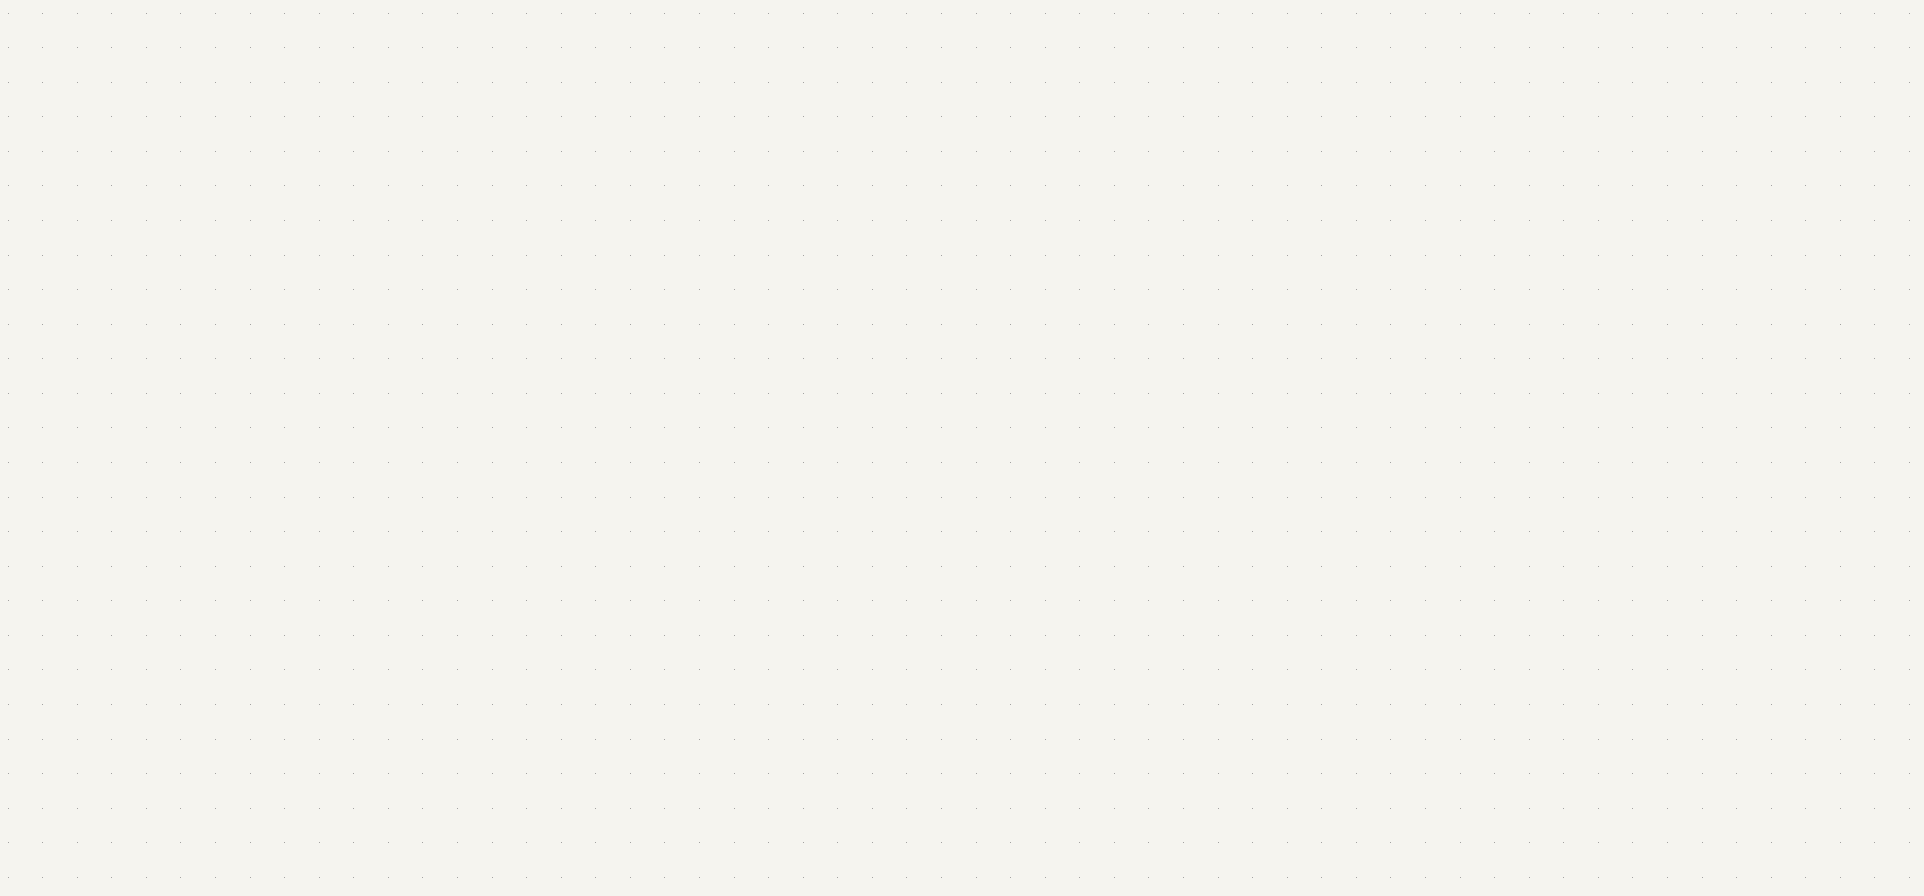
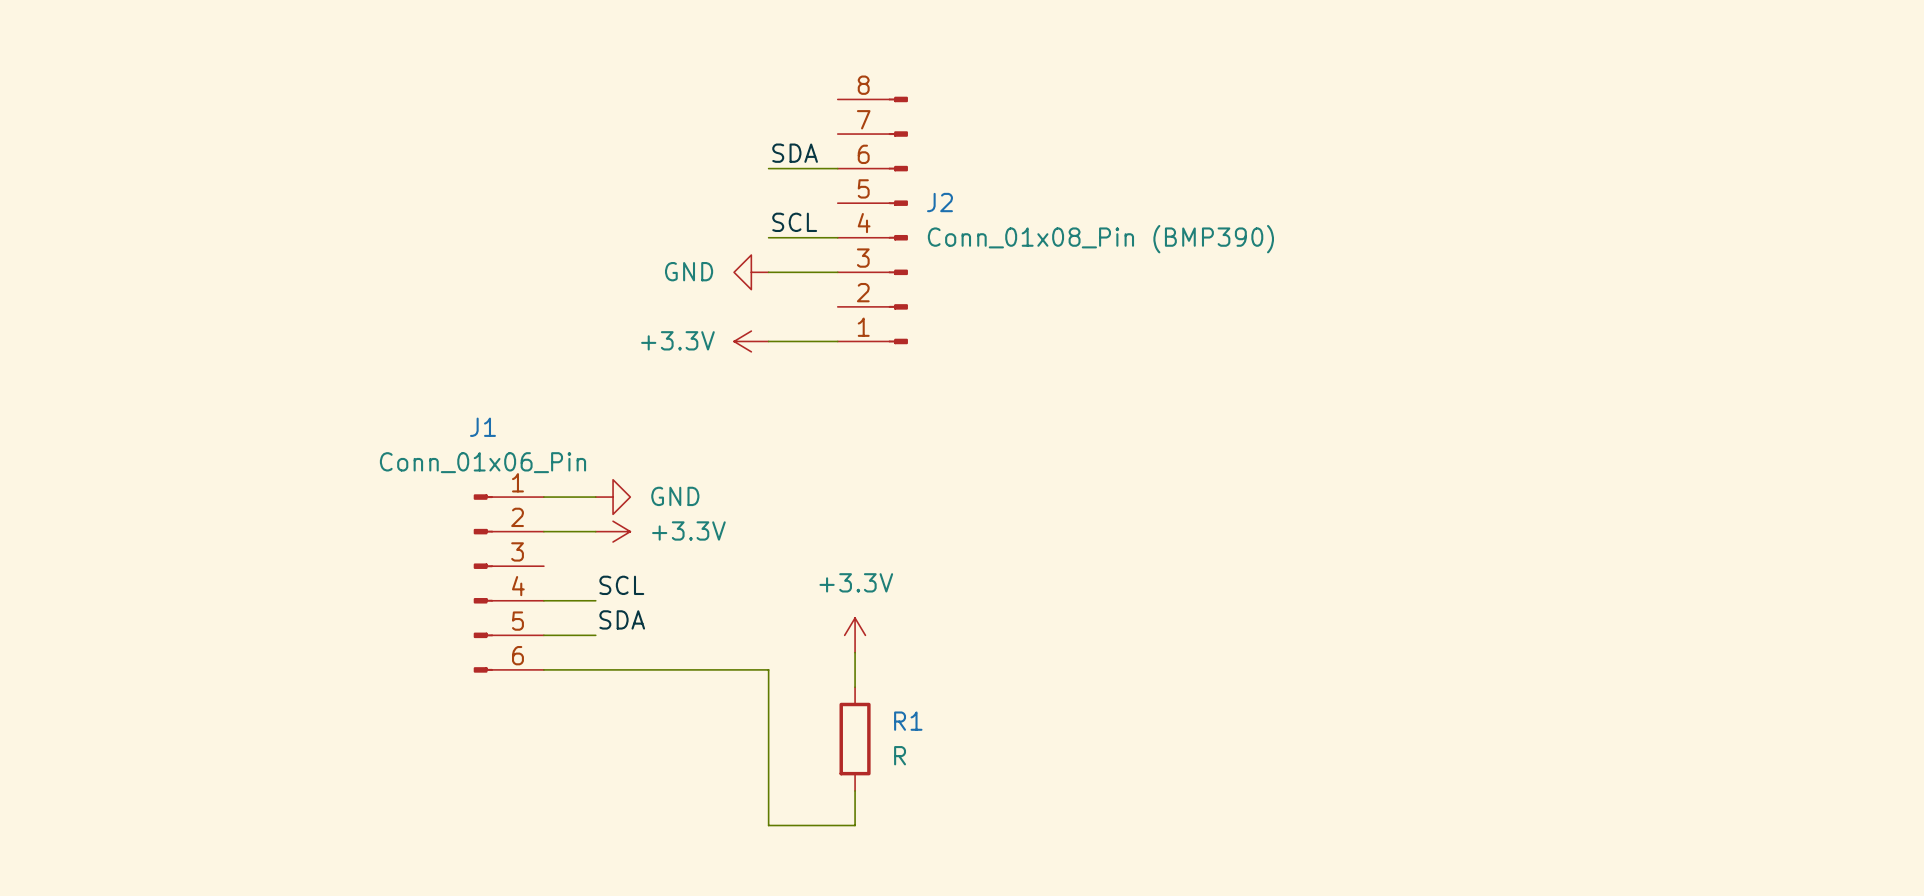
label: none -> SDA (795, 153)
wire: none -> (768, 168) (837, 168)
J2: none -> Conn_01x08_Pin (BMP390) (872, 220)
label: none -> SCL (794, 222)
wire: none -> (768, 237) (837, 237)
power symbol: none -> GND (751, 272)
wire: none -> (768, 272) (837, 272)
power symbol: none -> +3.3V (751, 341)
wire: none -> (768, 341) (837, 341)
wire: none -> (543, 497) (595, 497)
power symbol: none -> GND (613, 497)
wire: none -> (543, 531) (595, 531)
power symbol: none -> +3.3V (613, 531)
J1: none -> Conn_01x06_Pin (508, 583)
label: none -> SCL (621, 585)
wire: none -> (543, 600) (595, 600)
label: none -> SDA (622, 619)
wire: none -> (543, 635) (595, 635)
power symbol: none -> +3.3V (855, 635)
wire: none -> (855, 652) (855, 687)
wire: none -> (543, 669) (768, 669) (768, 825) (855, 825) (855, 790)
R1: none -> R (855, 739)

